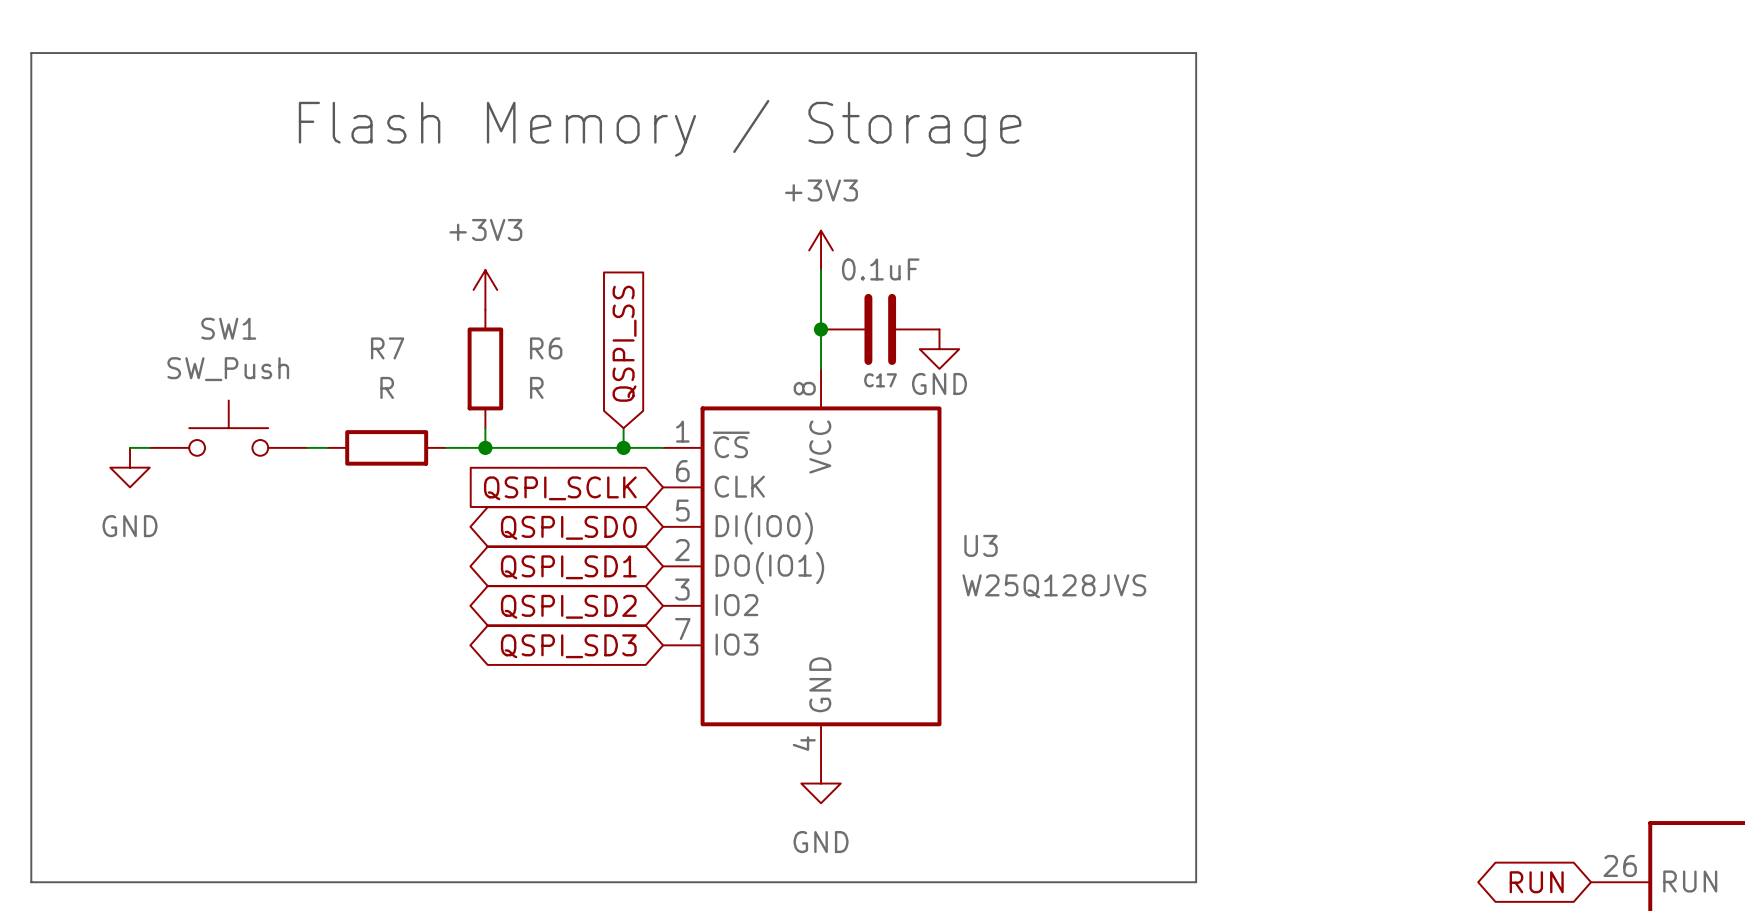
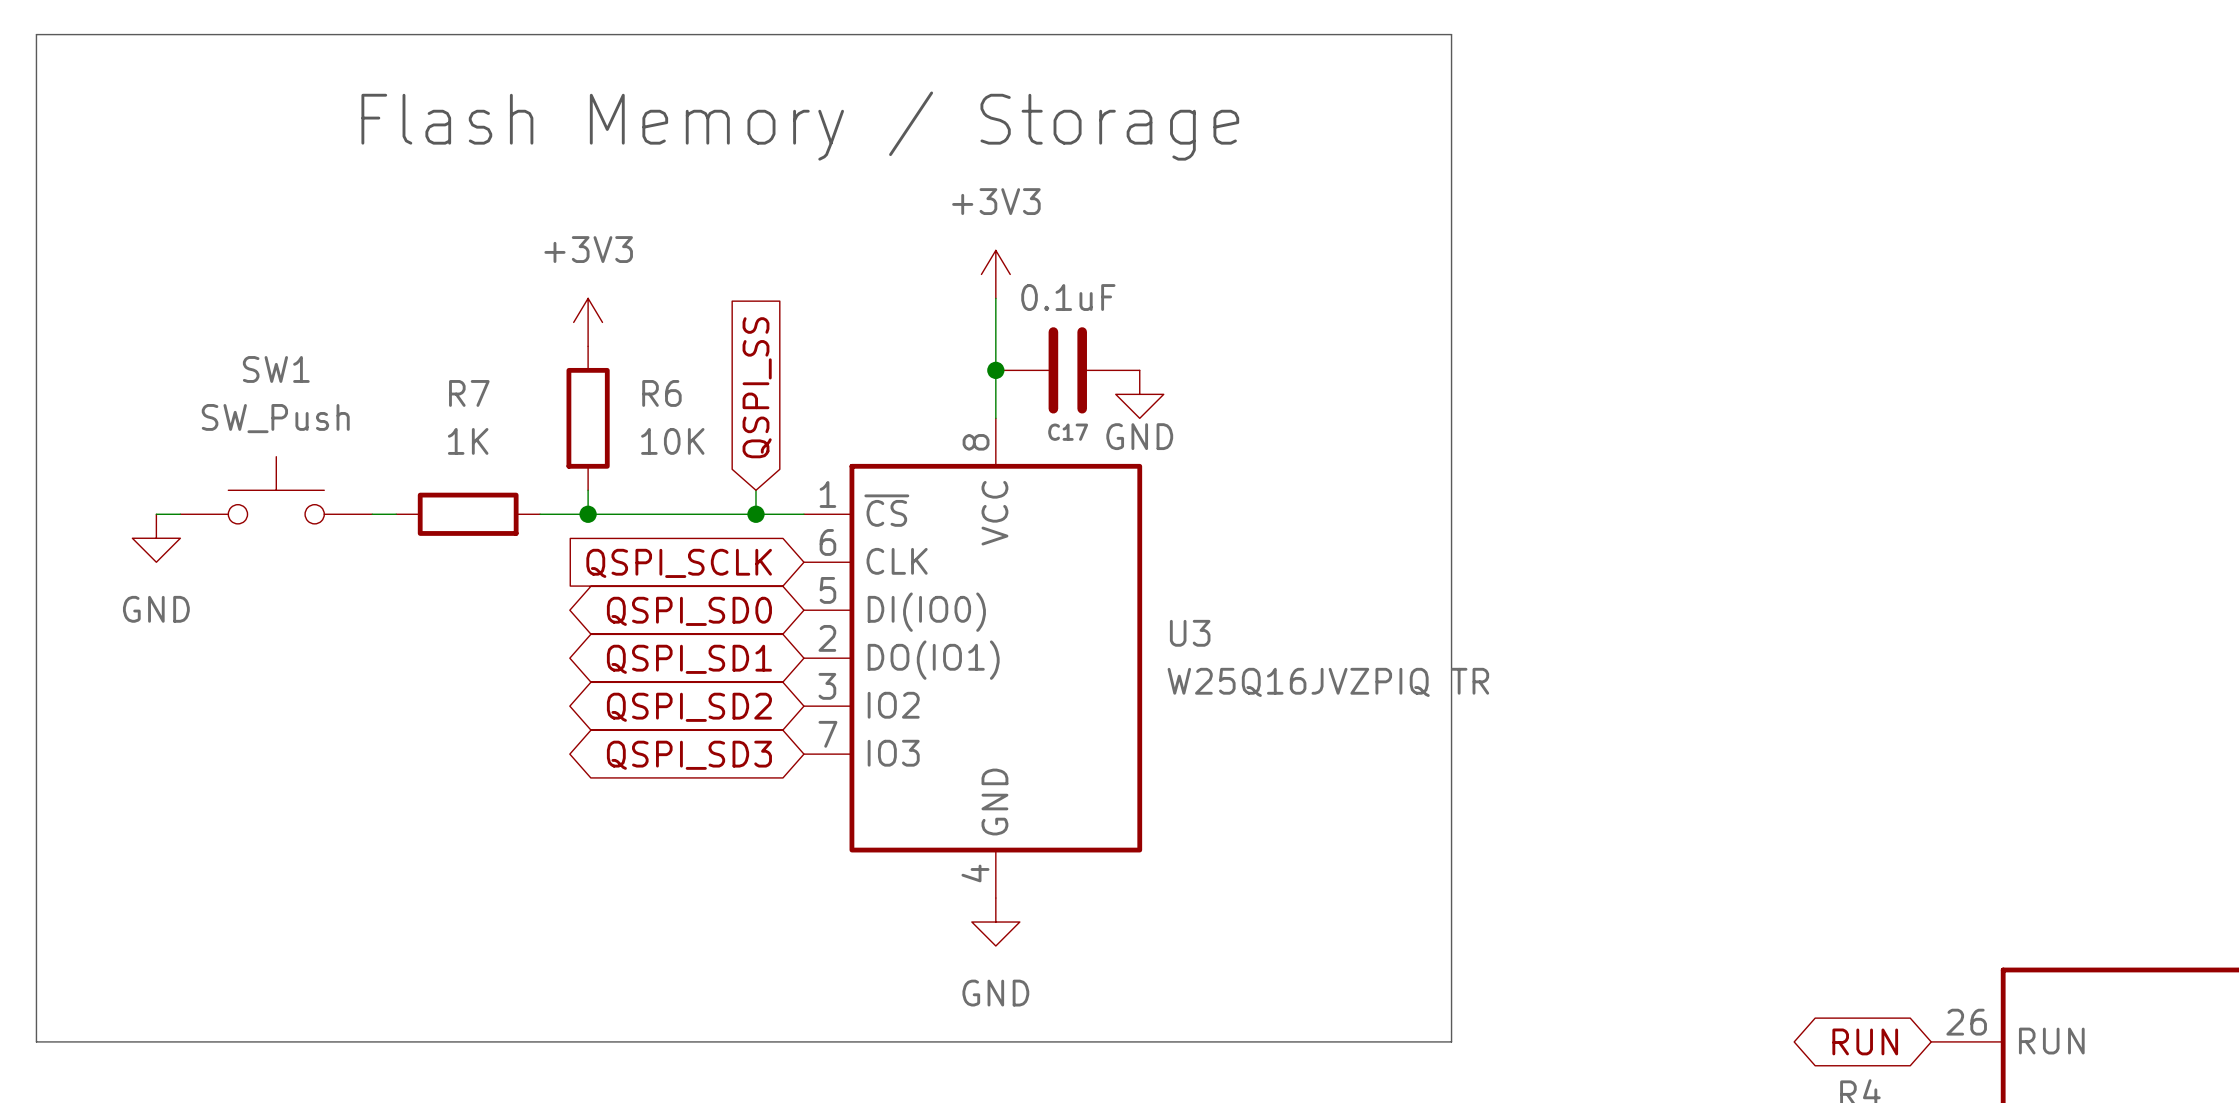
R7 value: R (387, 387) -> 1K (468, 441)
R6 value: R (536, 387) -> 10K (672, 441)
U3 value: W25Q128JVS (1054, 586) -> W25Q16JVZPIQ TR (1328, 682)

